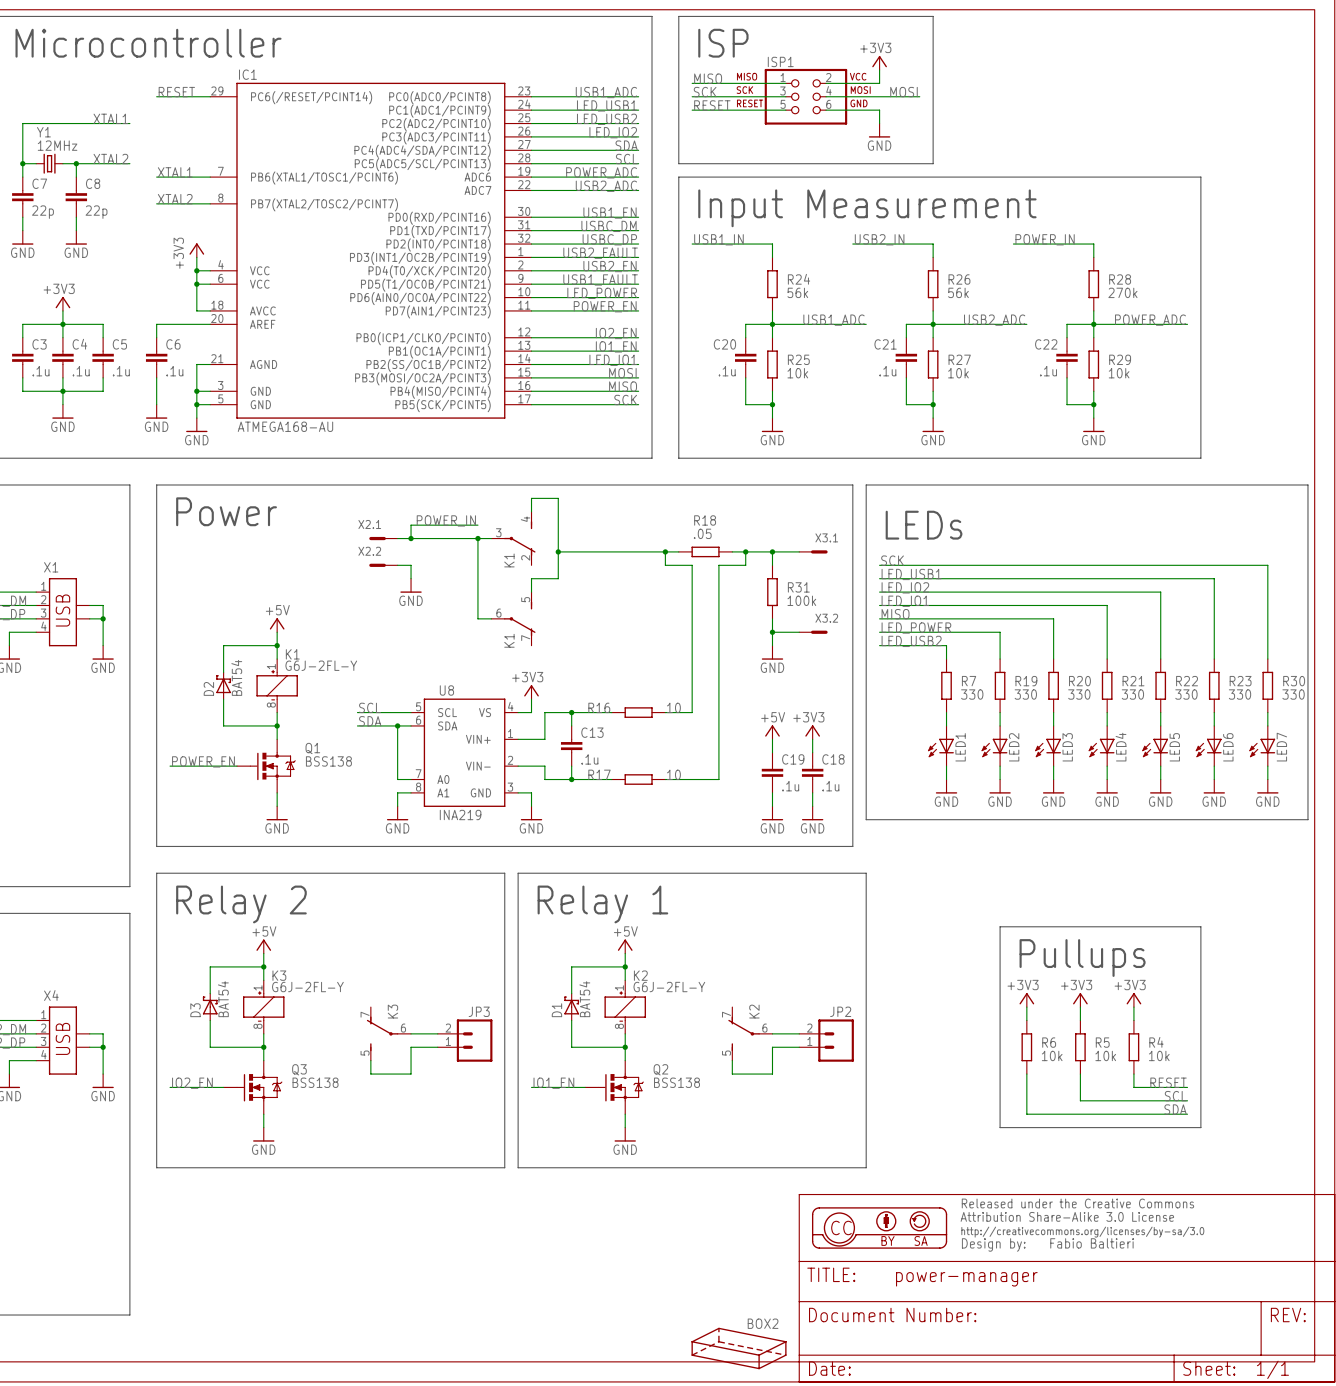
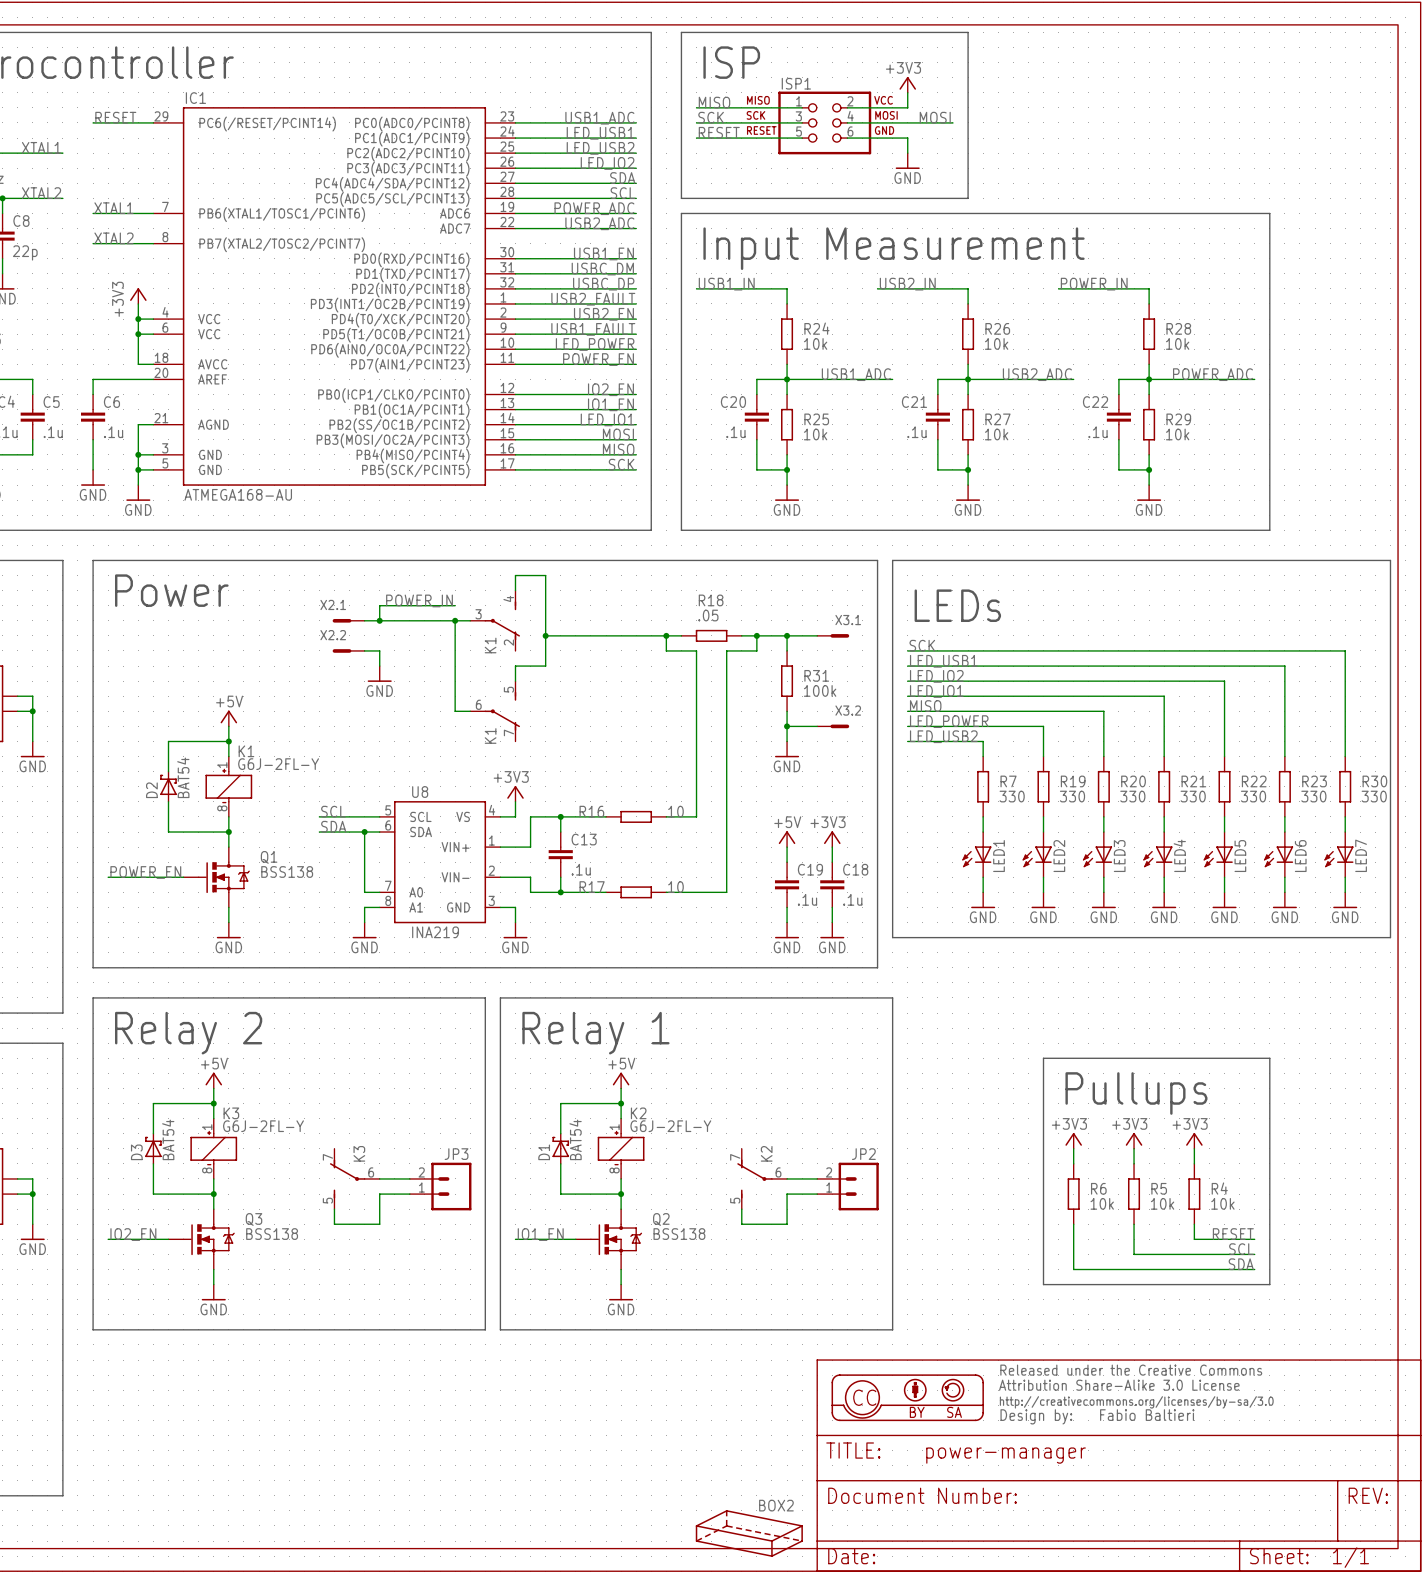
R24 value: 56k (797, 292) -> 10k (815, 343)
R26 value: 56k (958, 292) -> 10k (996, 343)
R28 value: 270k (1122, 292) -> 10k (1177, 343)

